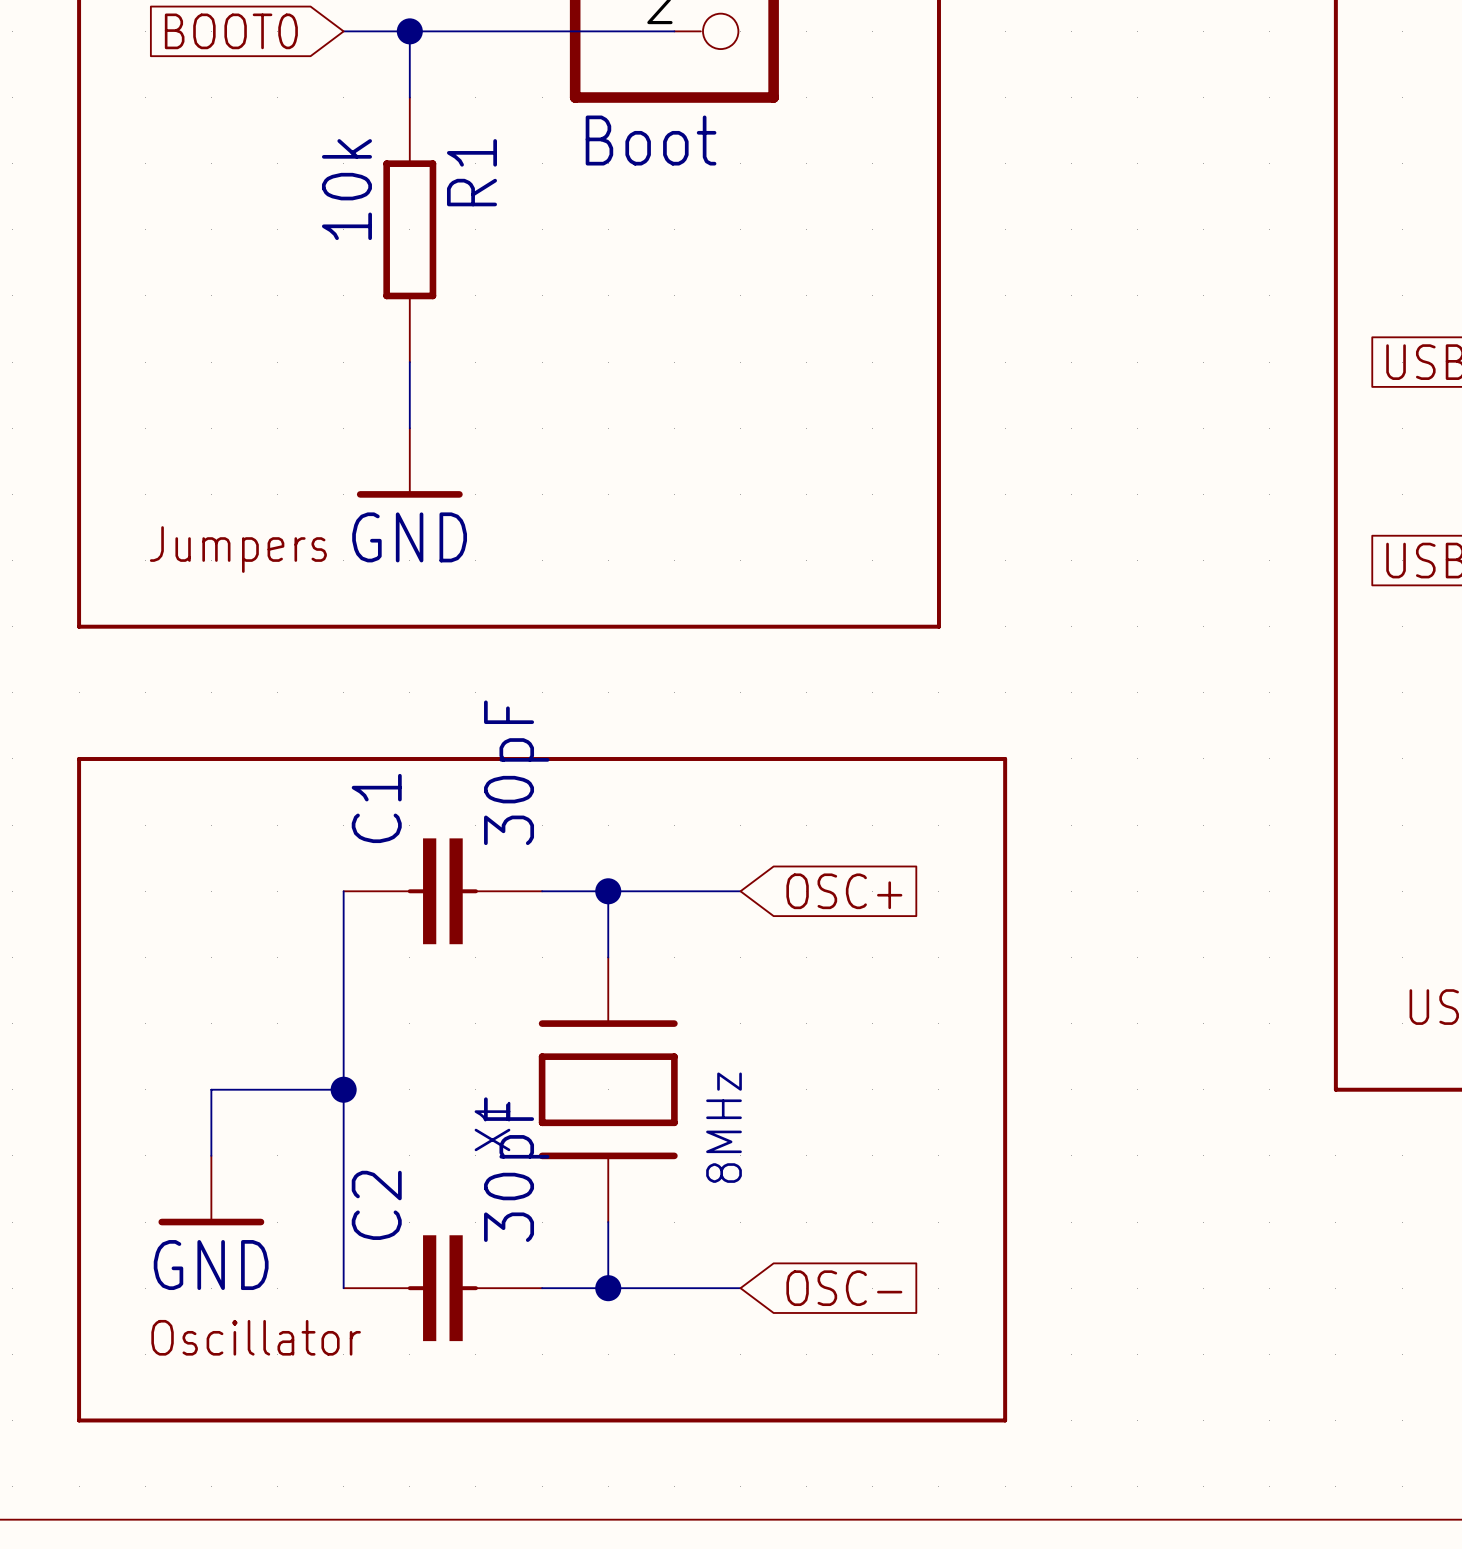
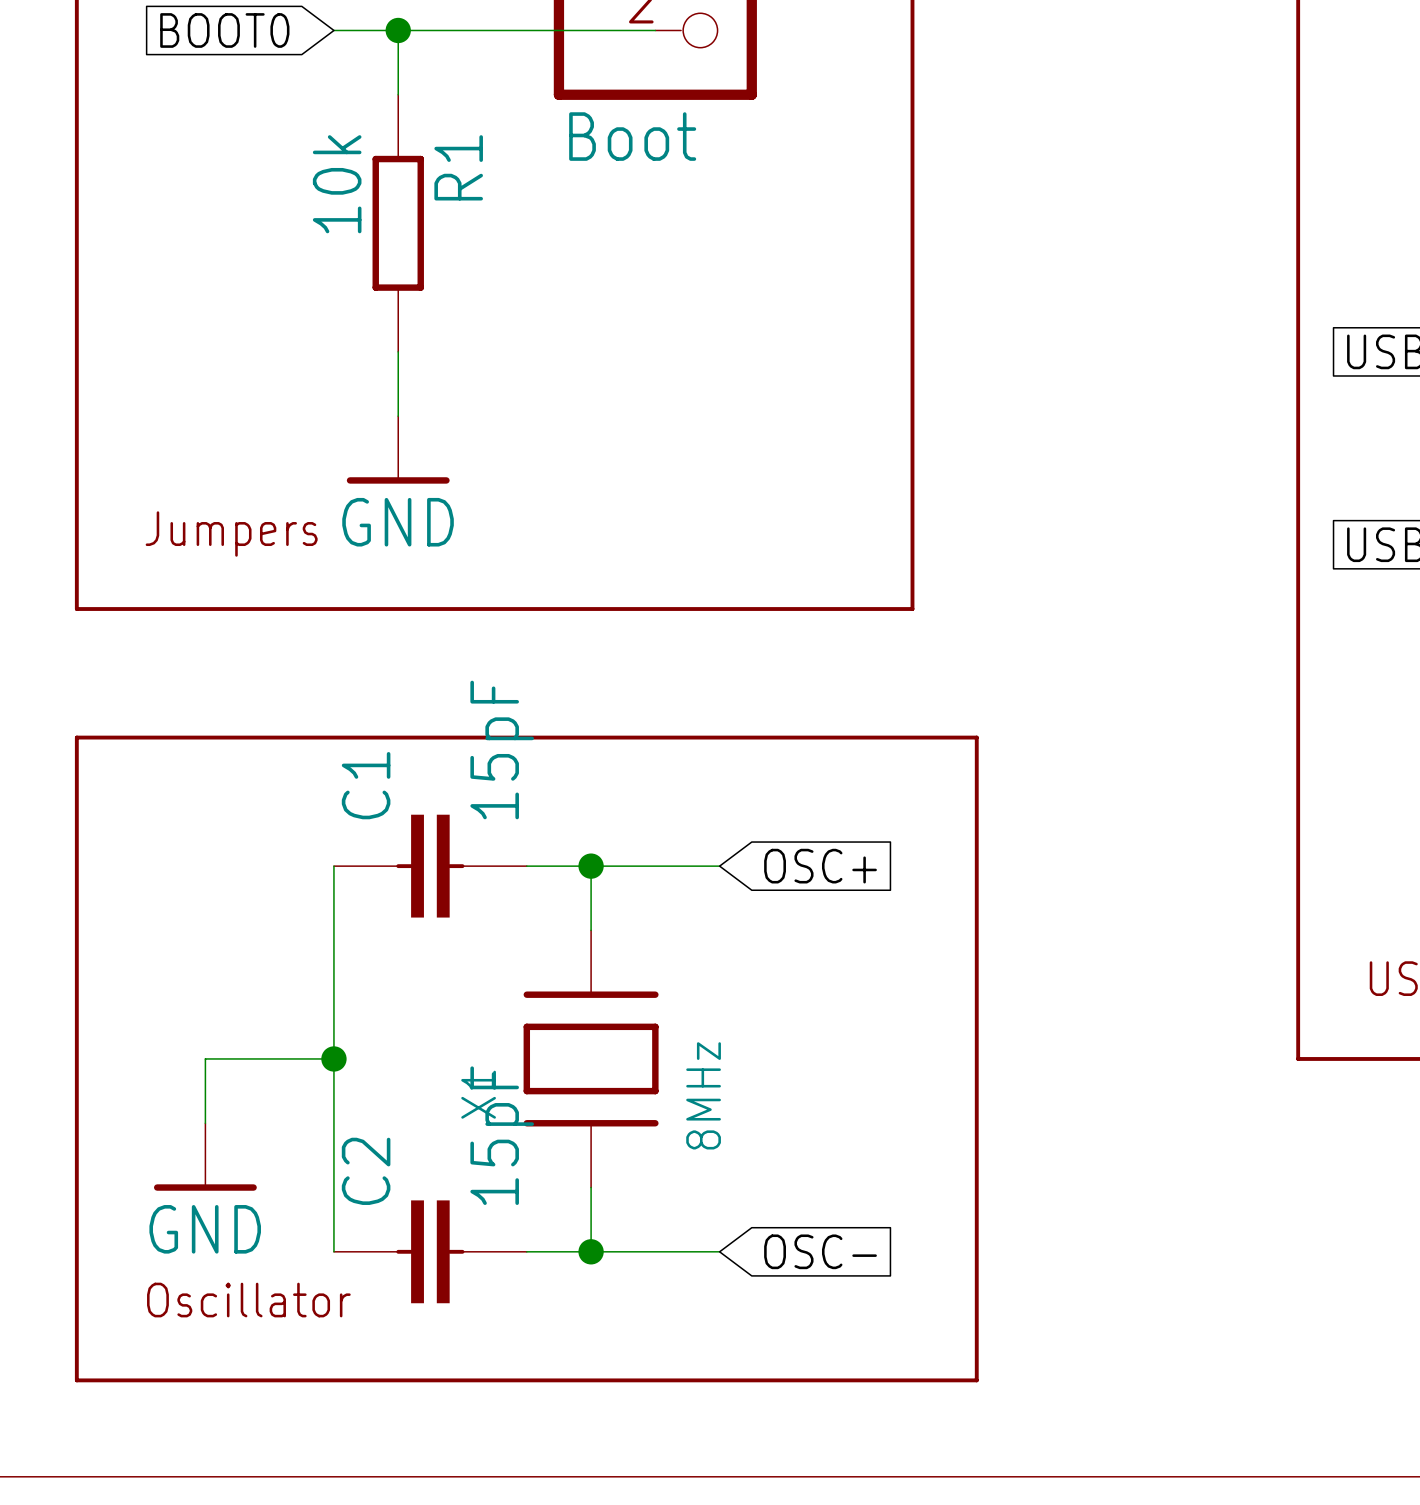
C1 value: 30pF (516, 772) -> 15pF (502, 749)
C2 value: 30pF (516, 1169) -> 15pF (502, 1135)

